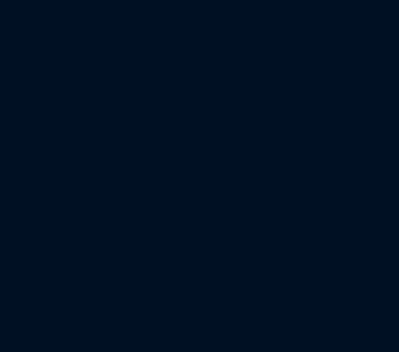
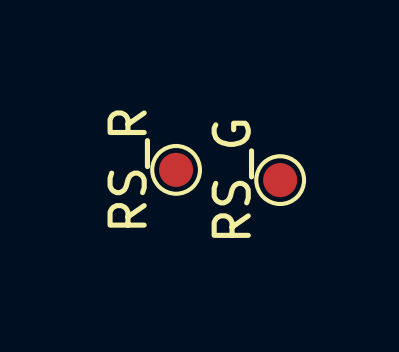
part: none -> RS_R (176, 169)
part: none -> RS_G (280, 180)

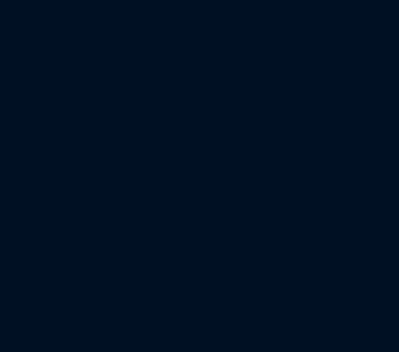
part: RS_R (176, 169) -> none
part: RS_G (280, 180) -> none

